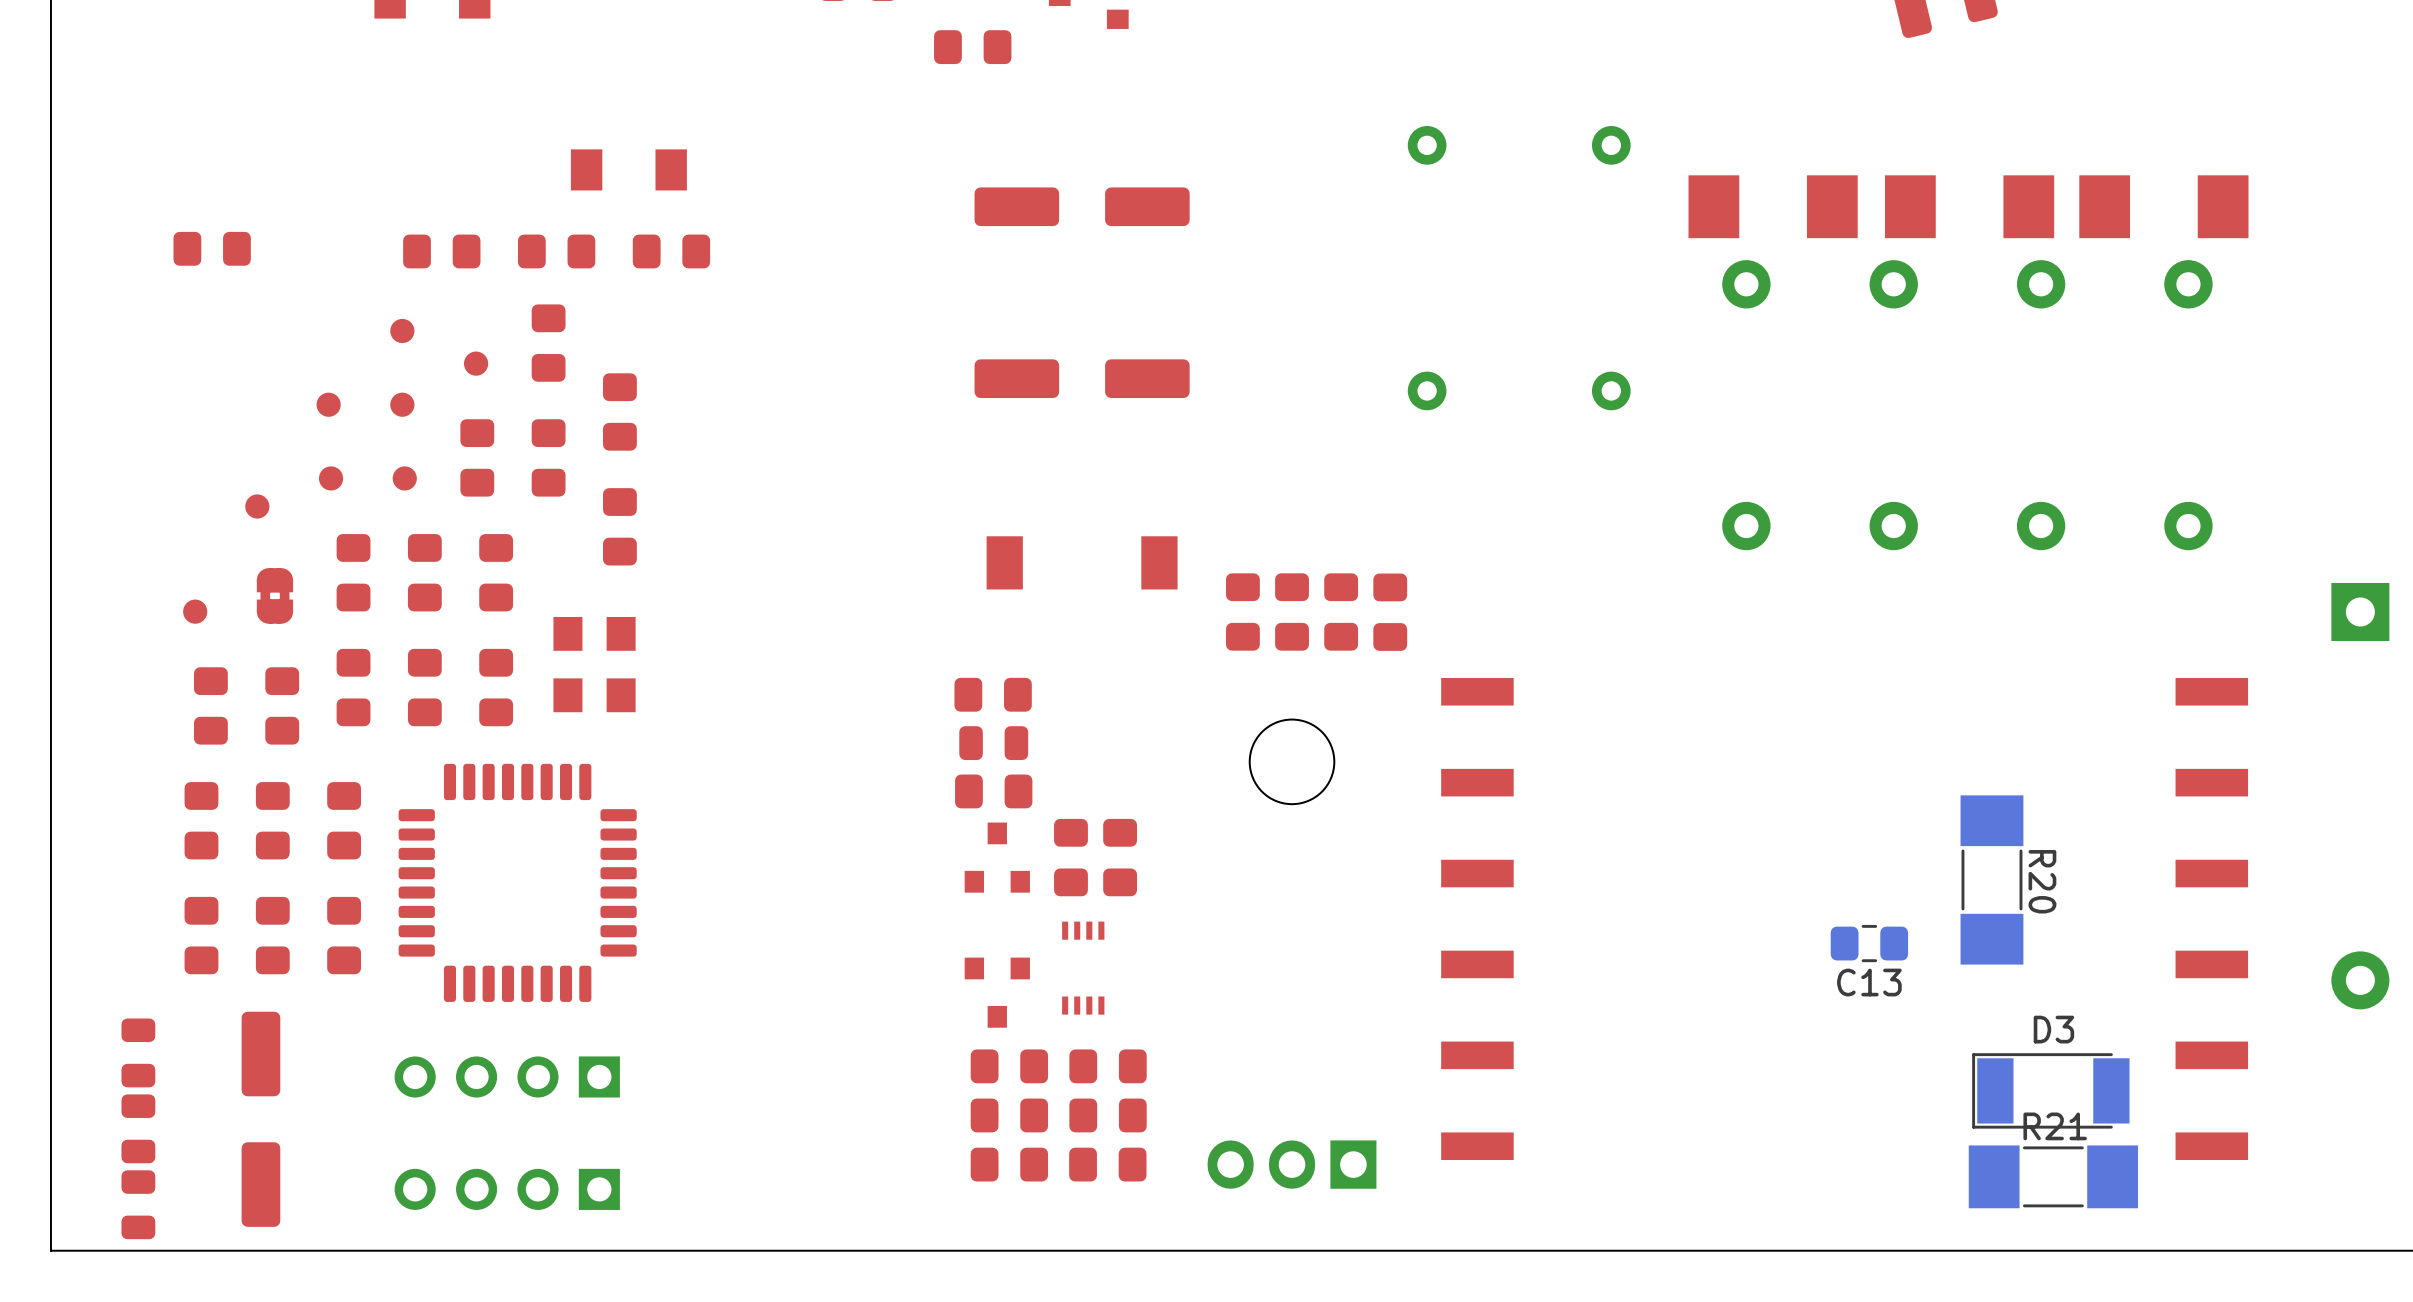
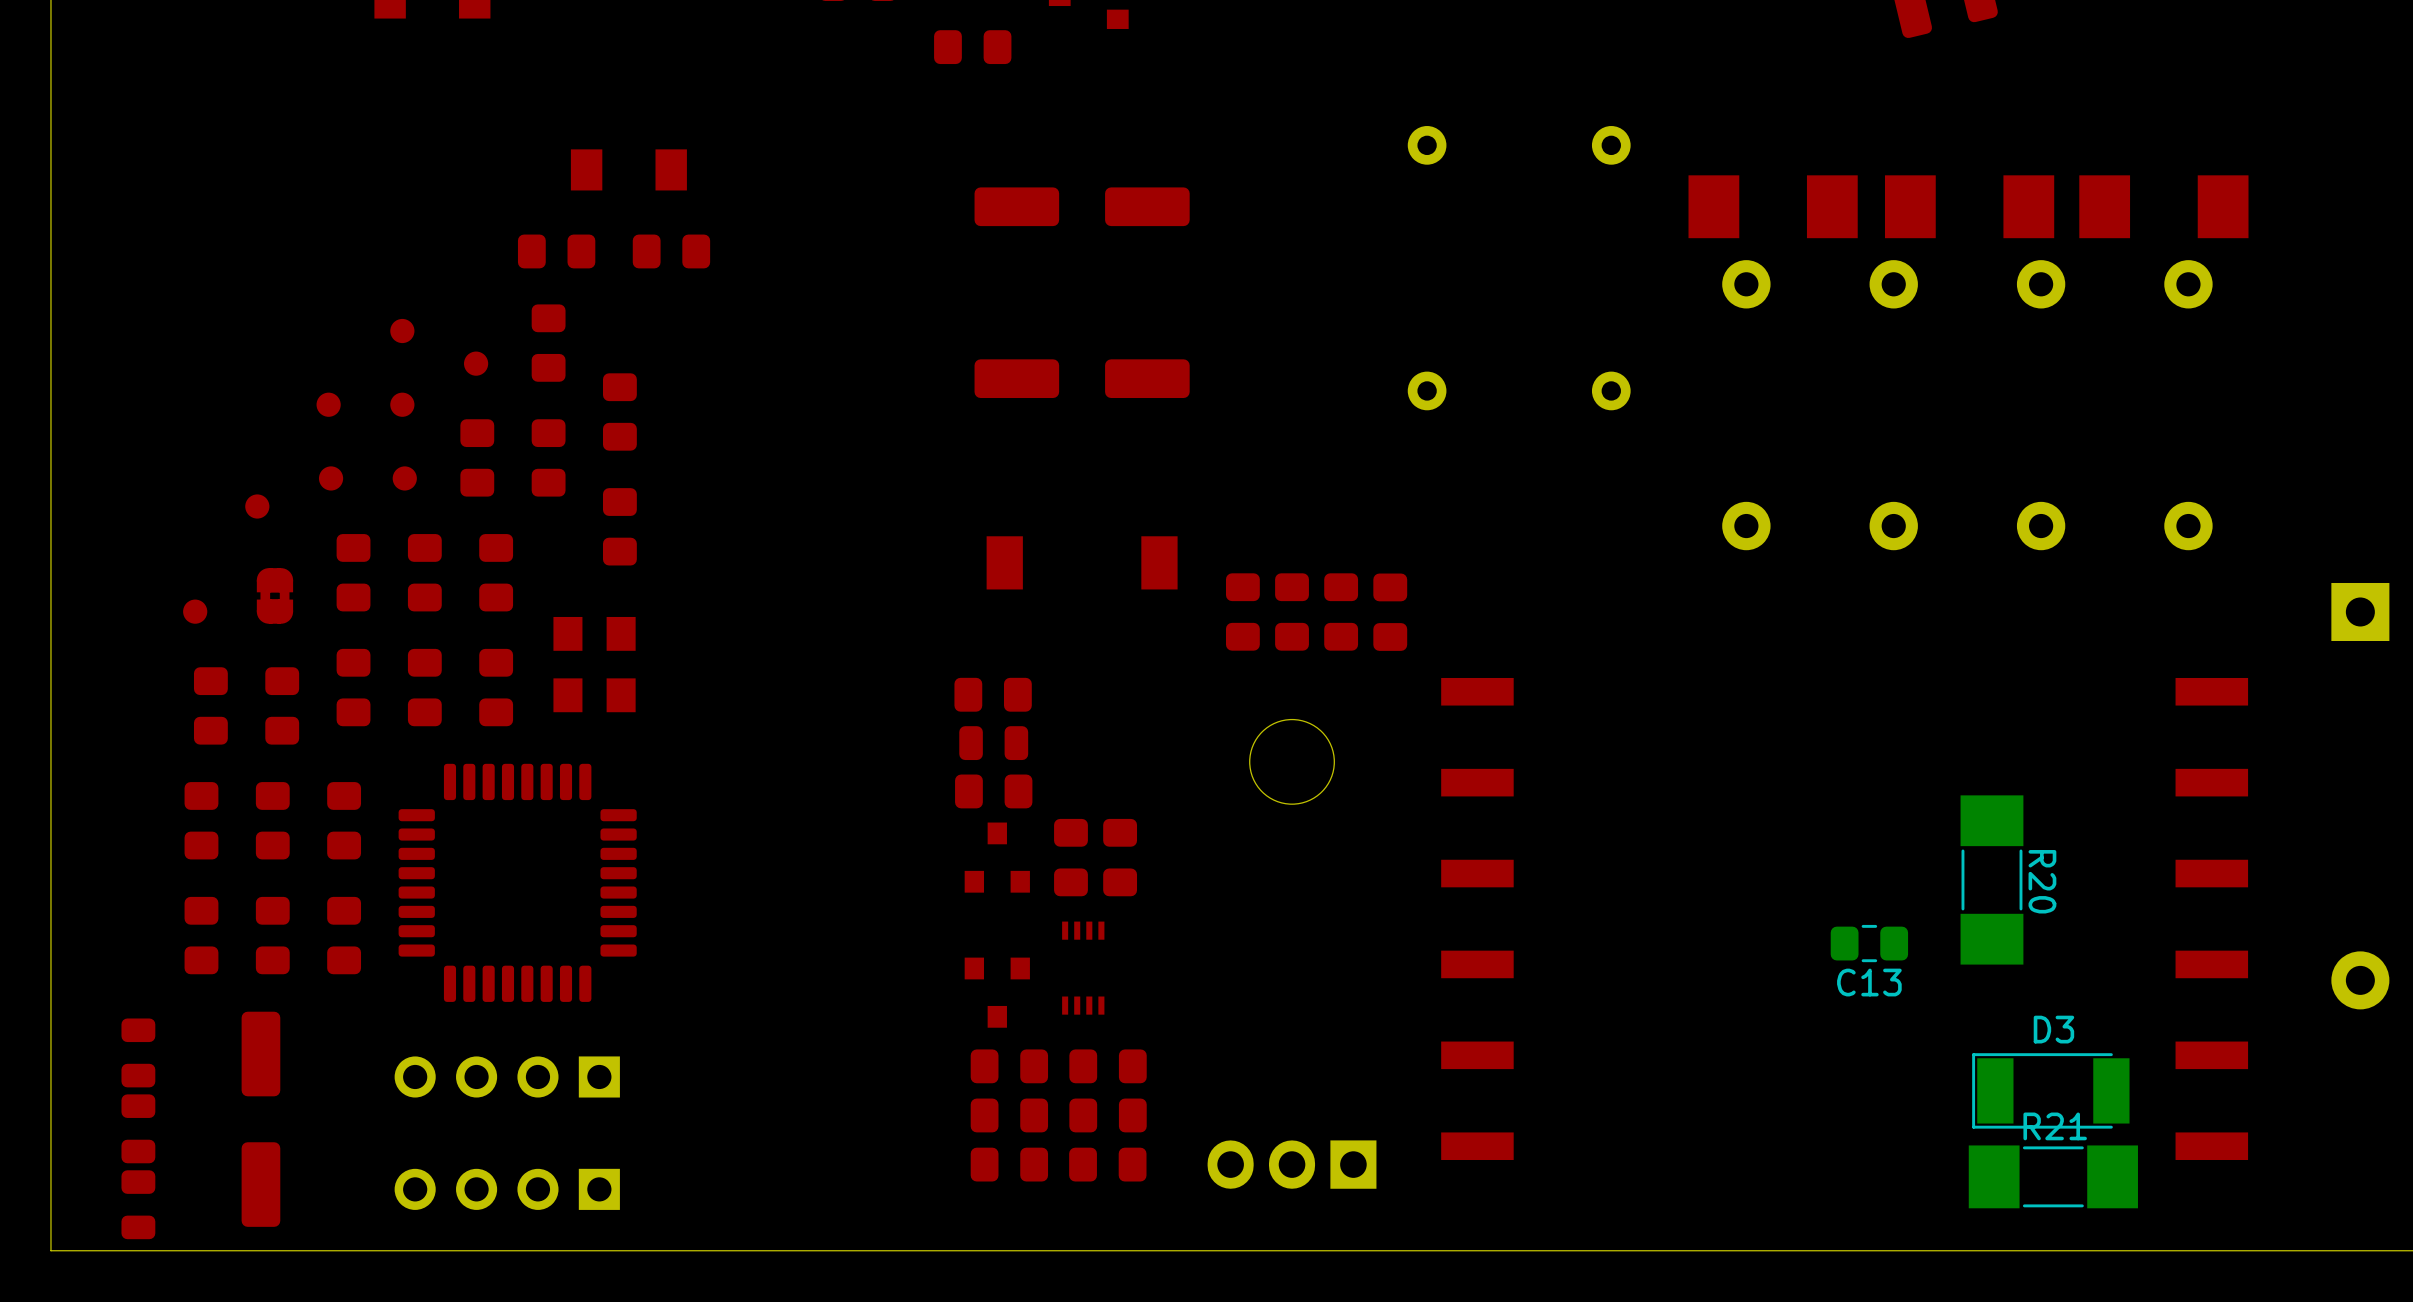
part: (212, 248) -> none
part: (441, 251) -> none

